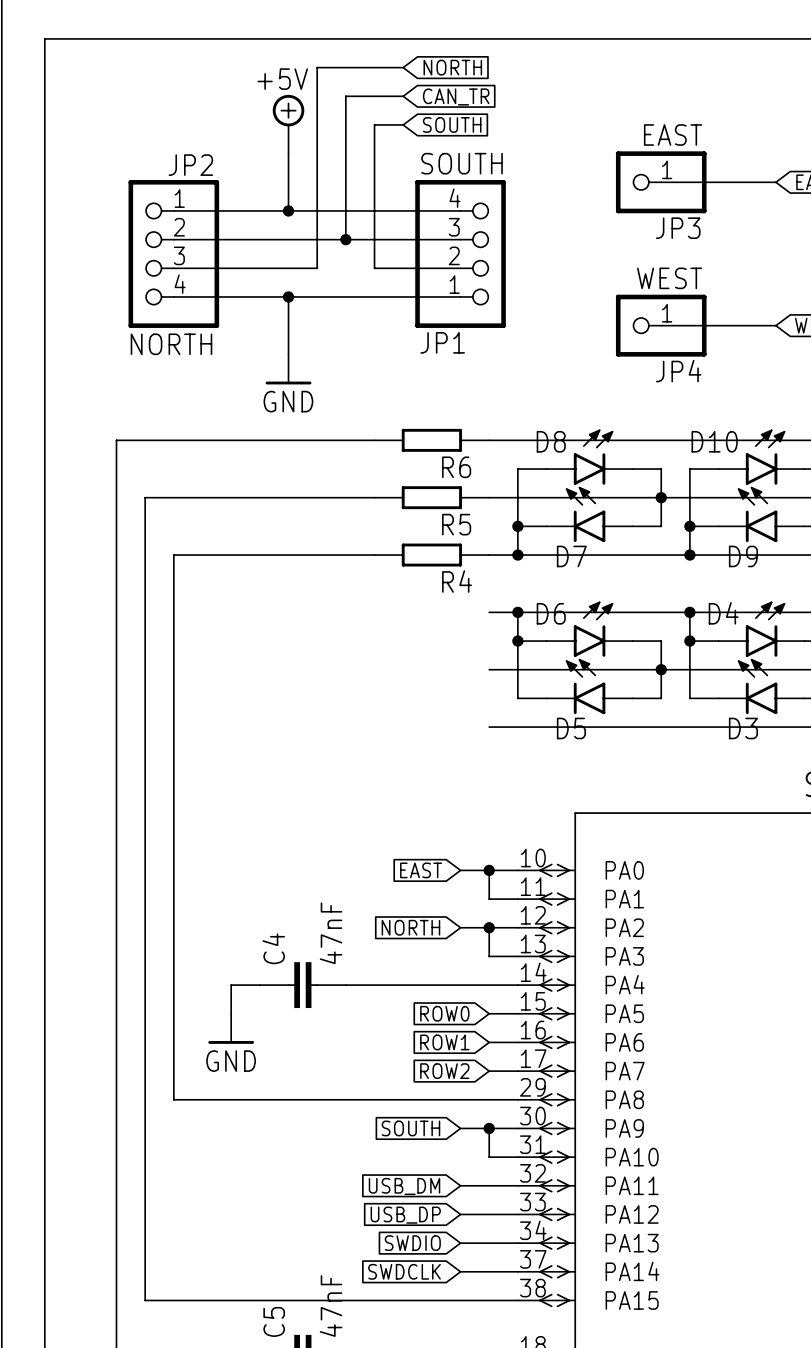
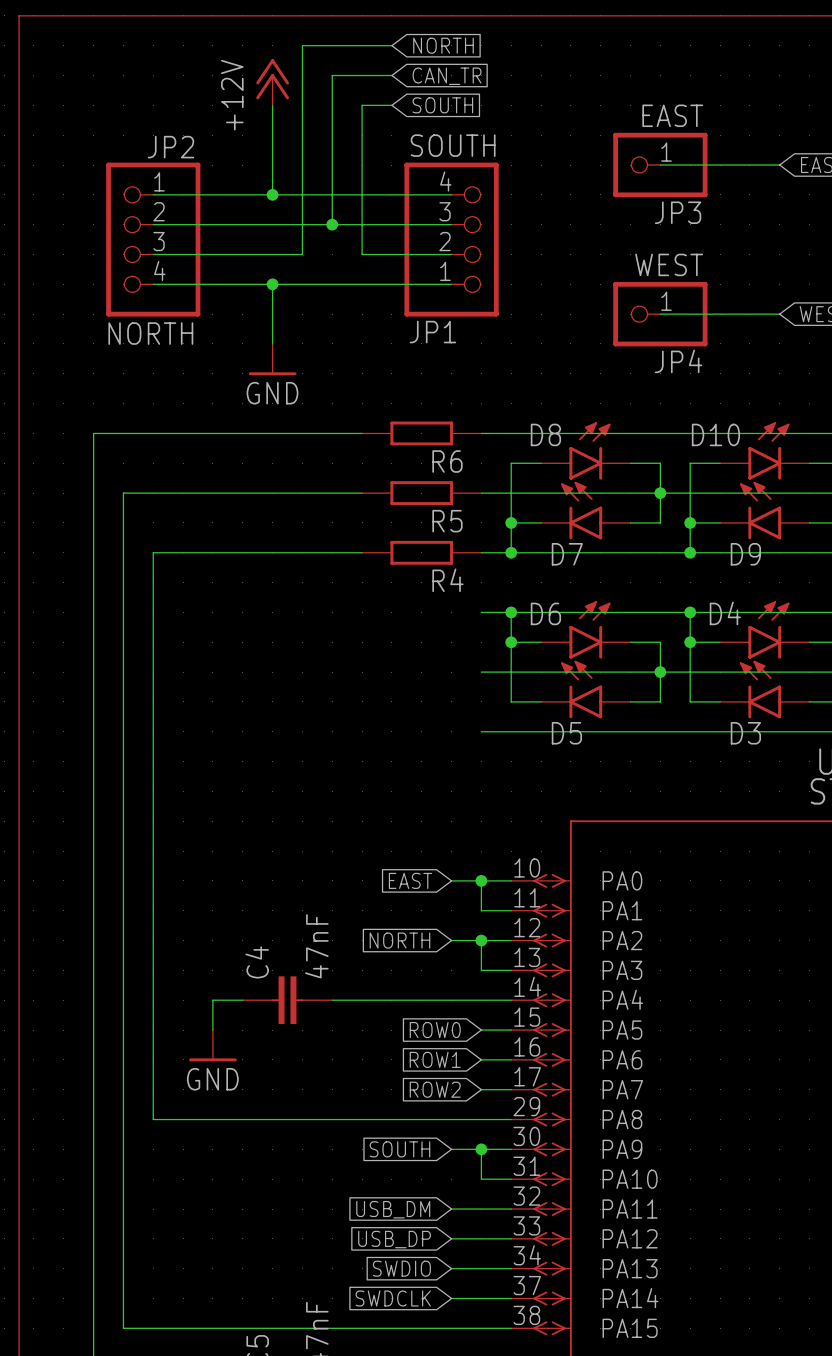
power symbol: none -> +12V (272, 82)
power symbol: +5V (288, 124) -> none

